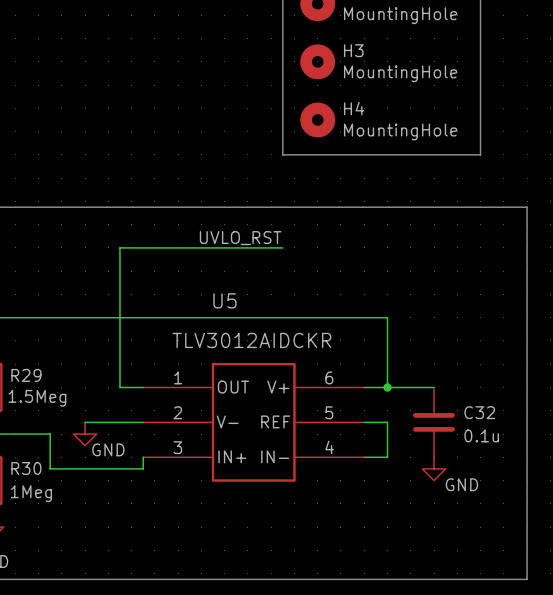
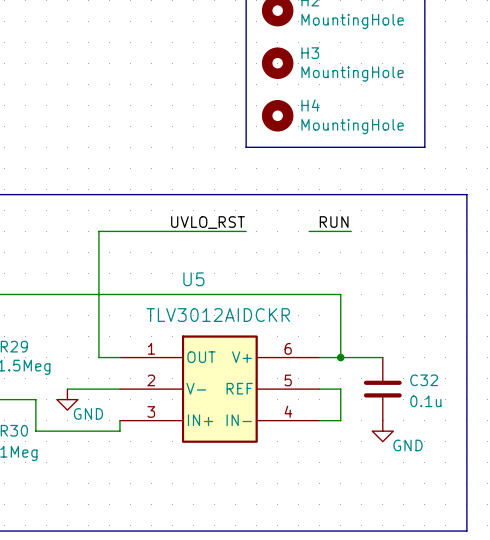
label: none -> RUN (334, 222)
wire: none -> (309, 231) (351, 231)

